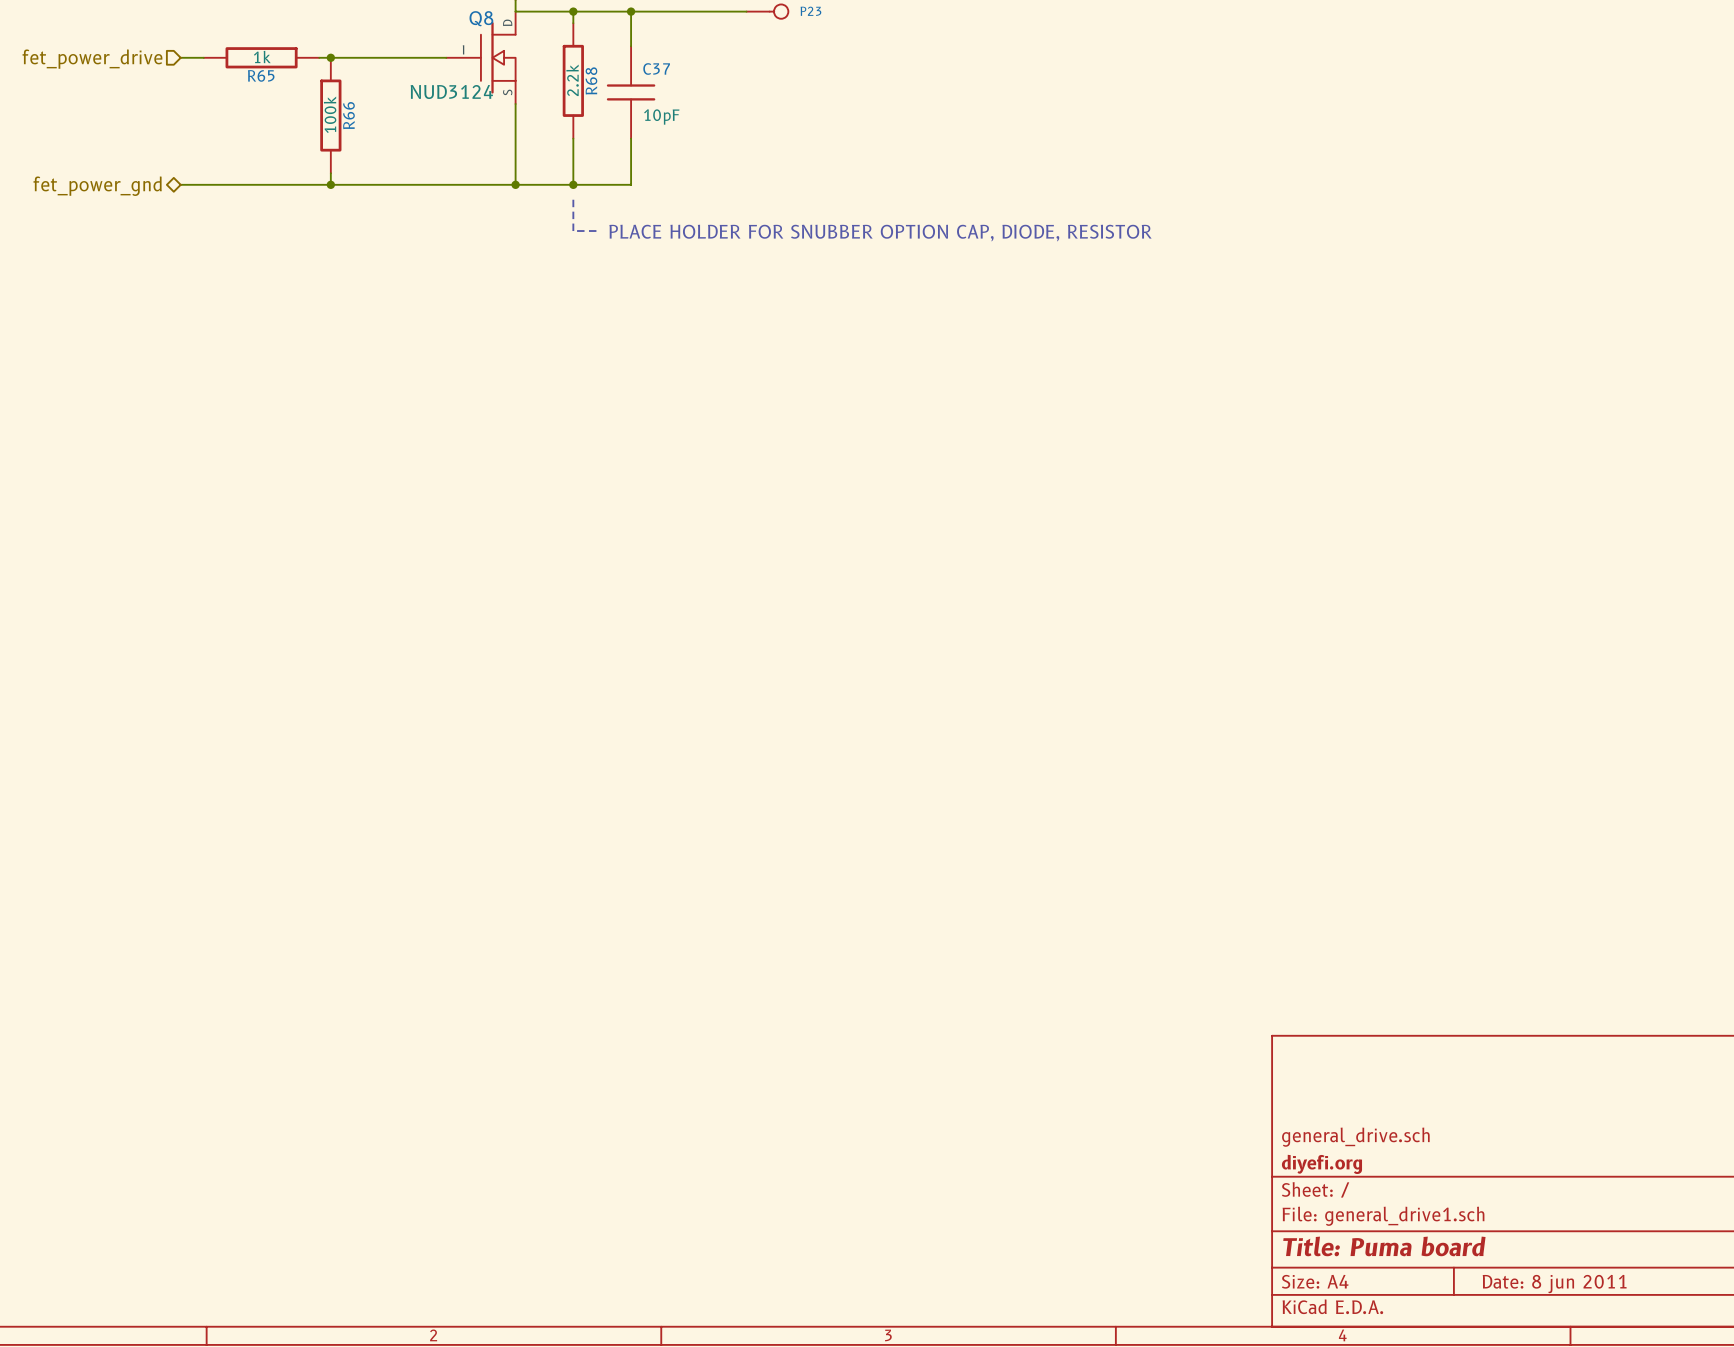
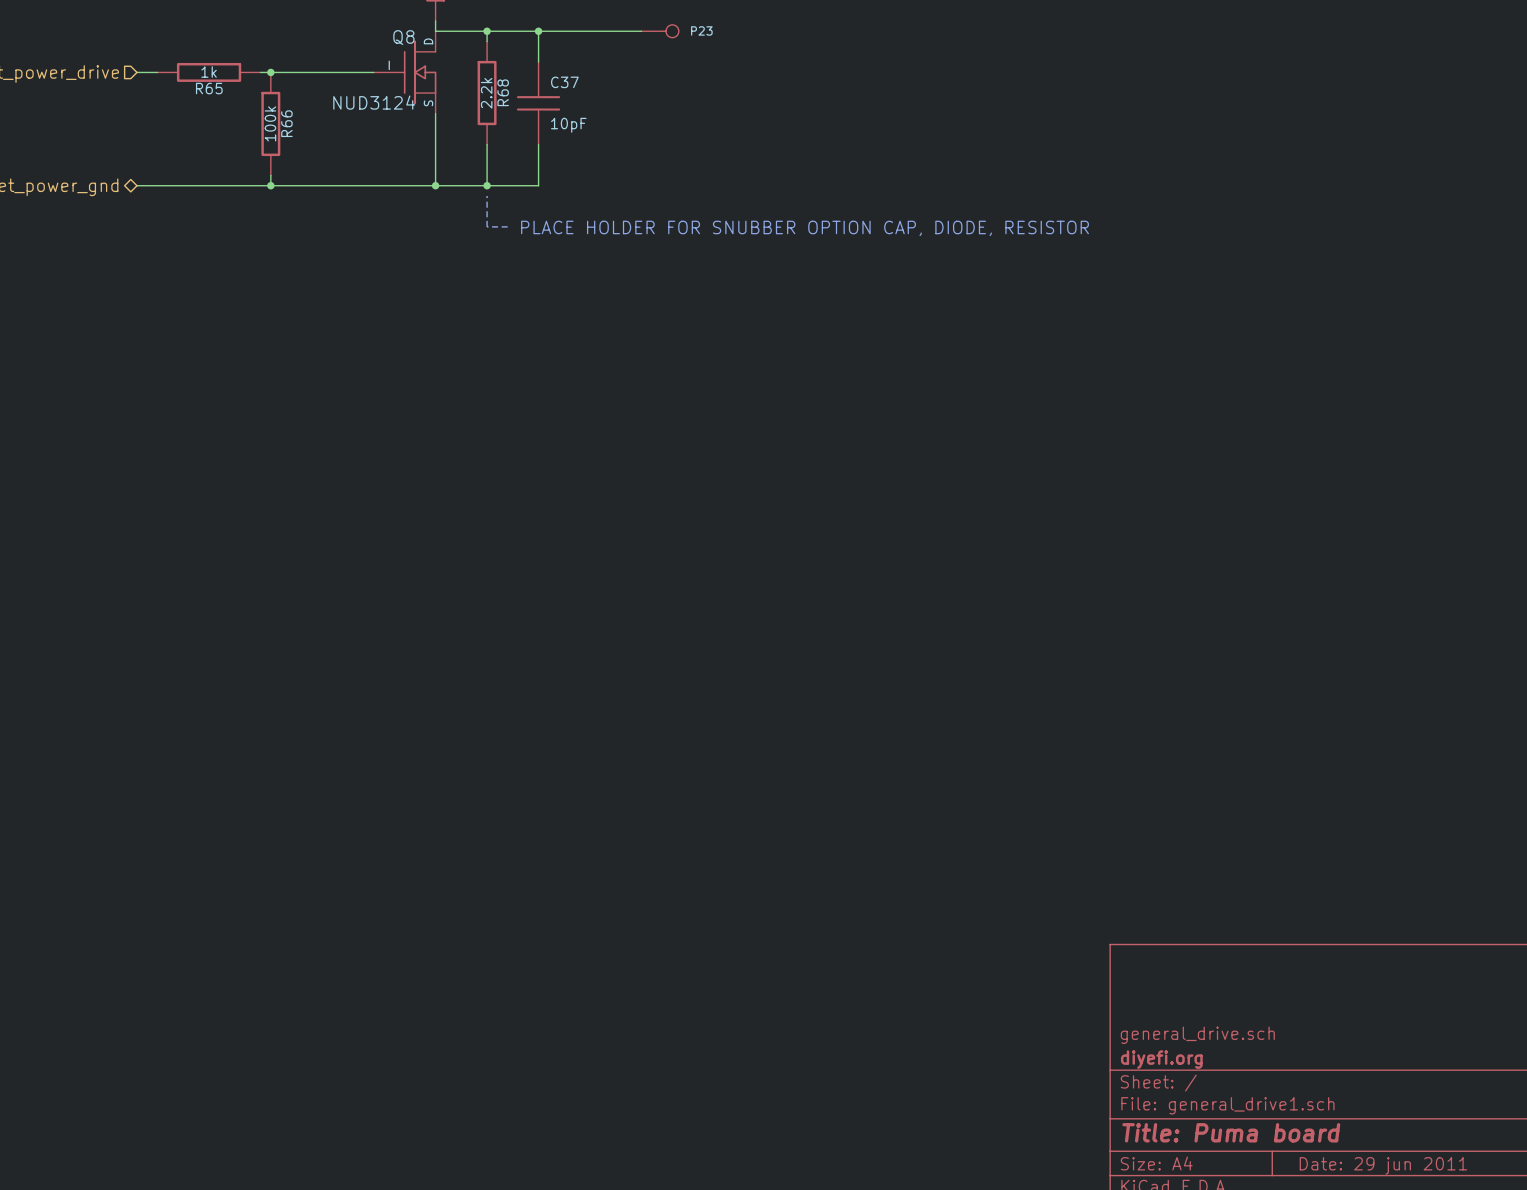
title block: Date: 8 jun 2011 (1554, 1284) -> Date: 29 jun 2011 (1383, 1165)

